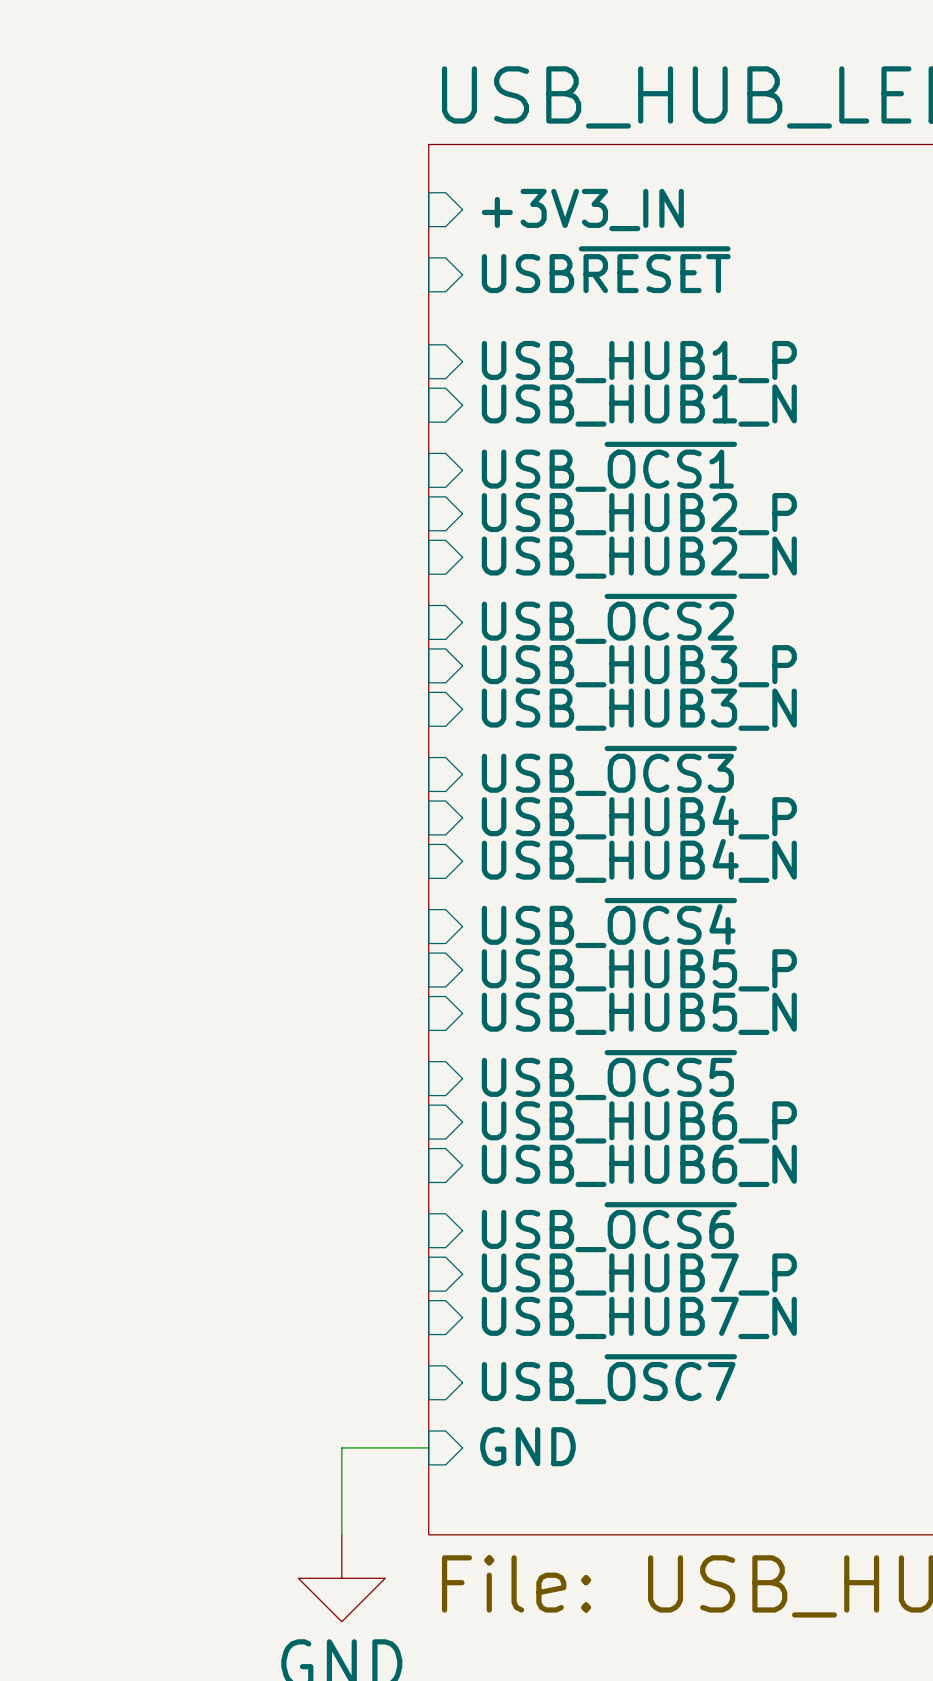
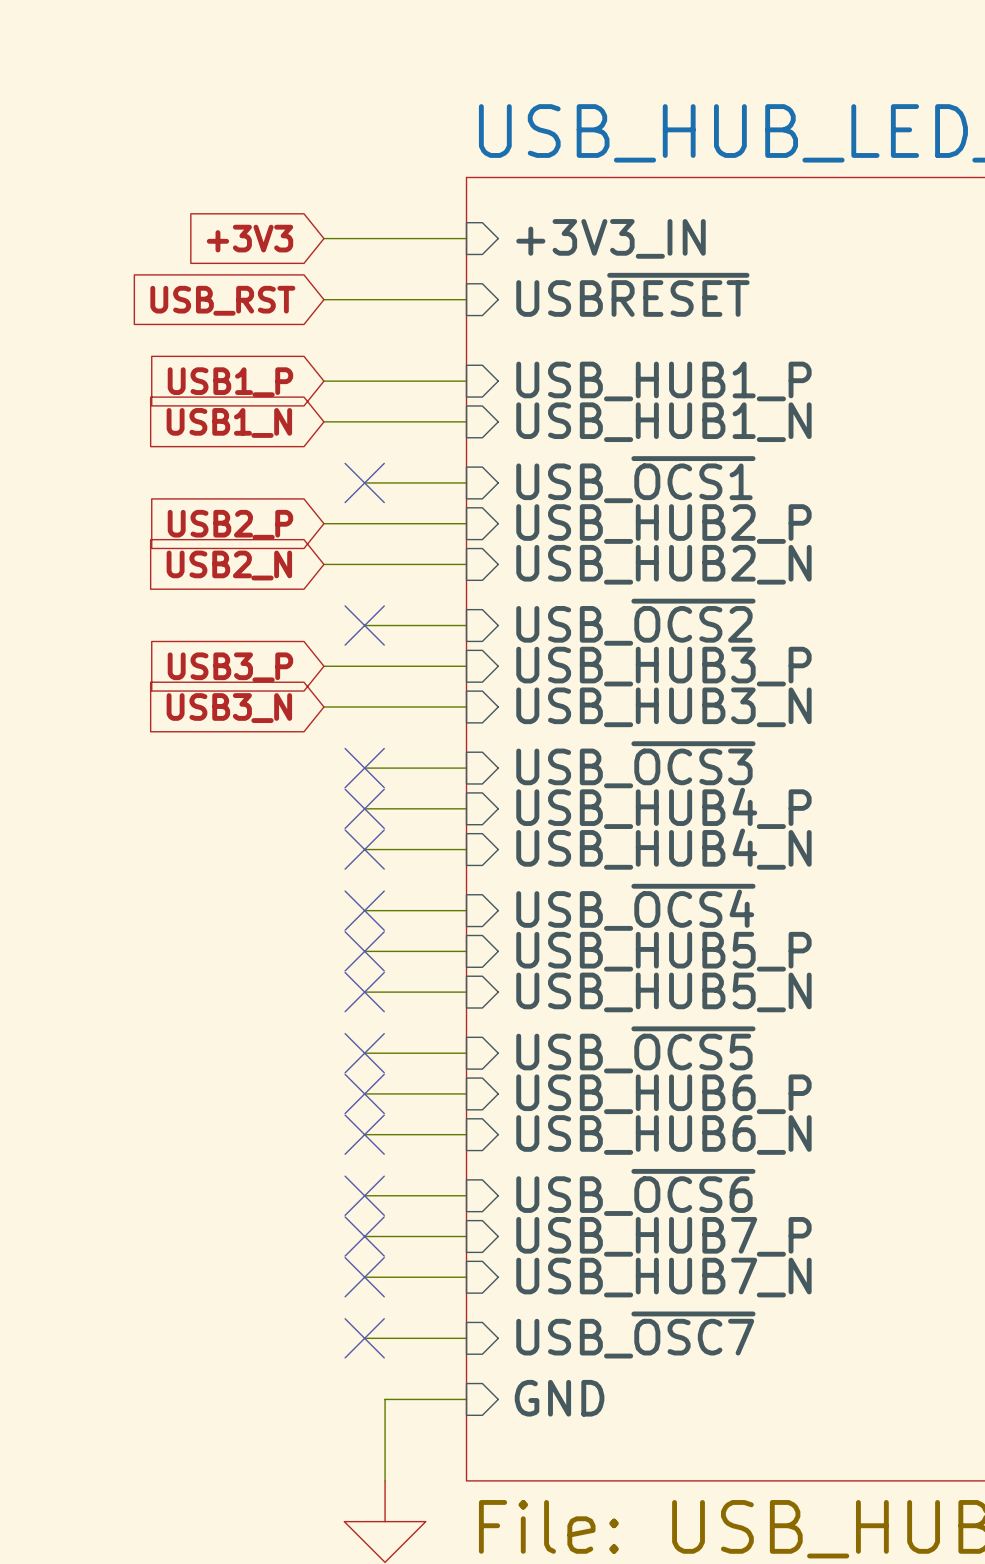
global label: none -> +3V3 (250, 238)
wire: none -> (323, 238) (466, 238)
wire: none -> (323, 299) (466, 299)
global label: none -> USB_RST (222, 300)
wire: none -> (323, 381) (466, 381)
global label: none -> USB1_P (230, 382)
wire: none -> (323, 421) (466, 421)
global label: none -> USB1_N (229, 422)
wire: none -> (364, 482) (466, 482)
no-connect mark: none -> (364, 482)
wire: none -> (323, 523) (466, 523)
global label: none -> USB2_P (230, 524)
wire: none -> (323, 564) (466, 564)
global label: none -> USB2_N (229, 565)
wire: none -> (364, 625) (466, 625)
no-connect mark: none -> (364, 625)
wire: none -> (323, 666) (466, 666)
global label: none -> USB3_P (230, 667)
wire: none -> (323, 706) (466, 706)
global label: none -> USB3_N (229, 708)
wire: none -> (364, 768) (466, 768)
no-connect mark: none -> (364, 768)
wire: none -> (364, 808) (466, 808)
no-connect mark: none -> (364, 808)
wire: none -> (364, 849) (466, 849)
no-connect mark: none -> (364, 849)
wire: none -> (364, 910) (466, 910)
no-connect mark: none -> (364, 910)
wire: none -> (364, 951) (466, 951)
no-connect mark: none -> (364, 951)
wire: none -> (364, 992) (466, 992)
no-connect mark: none -> (364, 992)
wire: none -> (364, 1053) (466, 1053)
no-connect mark: none -> (364, 1053)
wire: none -> (364, 1093) (466, 1093)
no-connect mark: none -> (364, 1093)
wire: none -> (364, 1134) (466, 1134)
no-connect mark: none -> (364, 1134)
wire: none -> (364, 1195) (466, 1195)
no-connect mark: none -> (364, 1195)
wire: none -> (364, 1236) (466, 1236)
no-connect mark: none -> (364, 1236)
wire: none -> (364, 1277) (466, 1277)
no-connect mark: none -> (364, 1277)
wire: none -> (364, 1338) (466, 1338)
no-connect mark: none -> (364, 1338)

